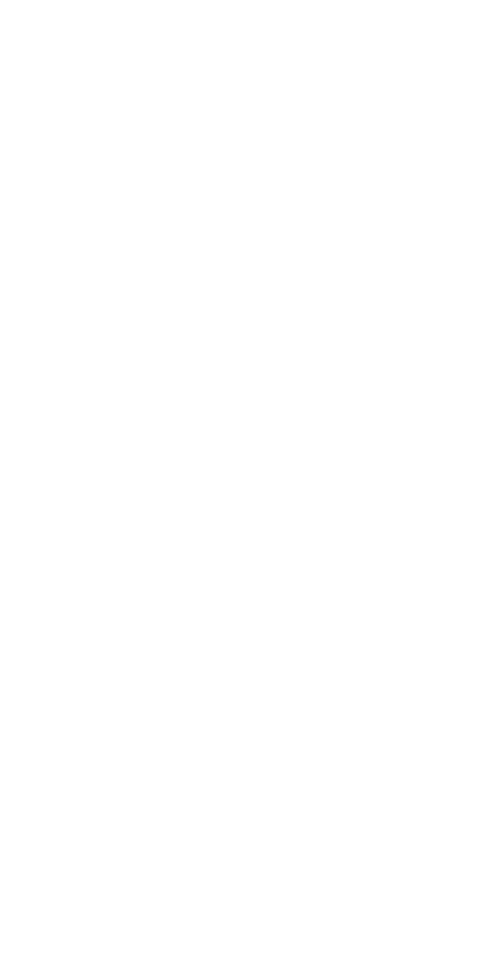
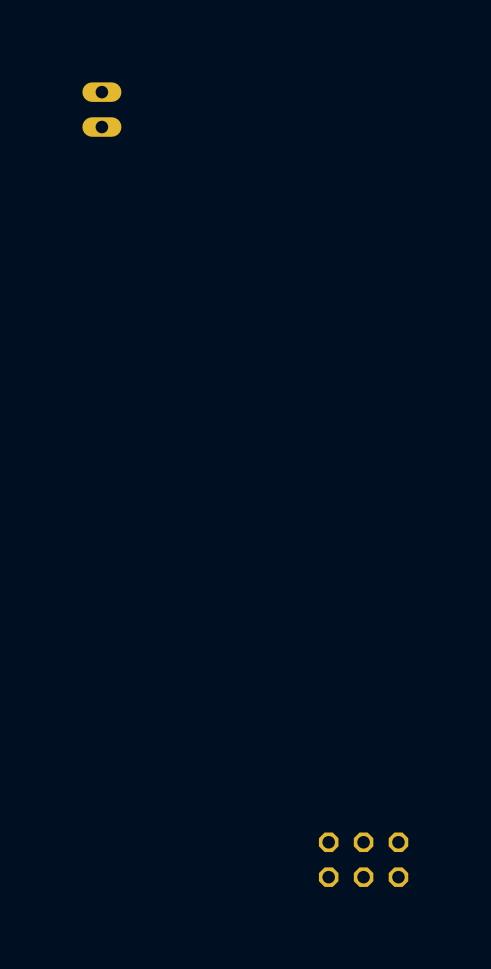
part: none -> (101, 109)
part: none -> (363, 859)

